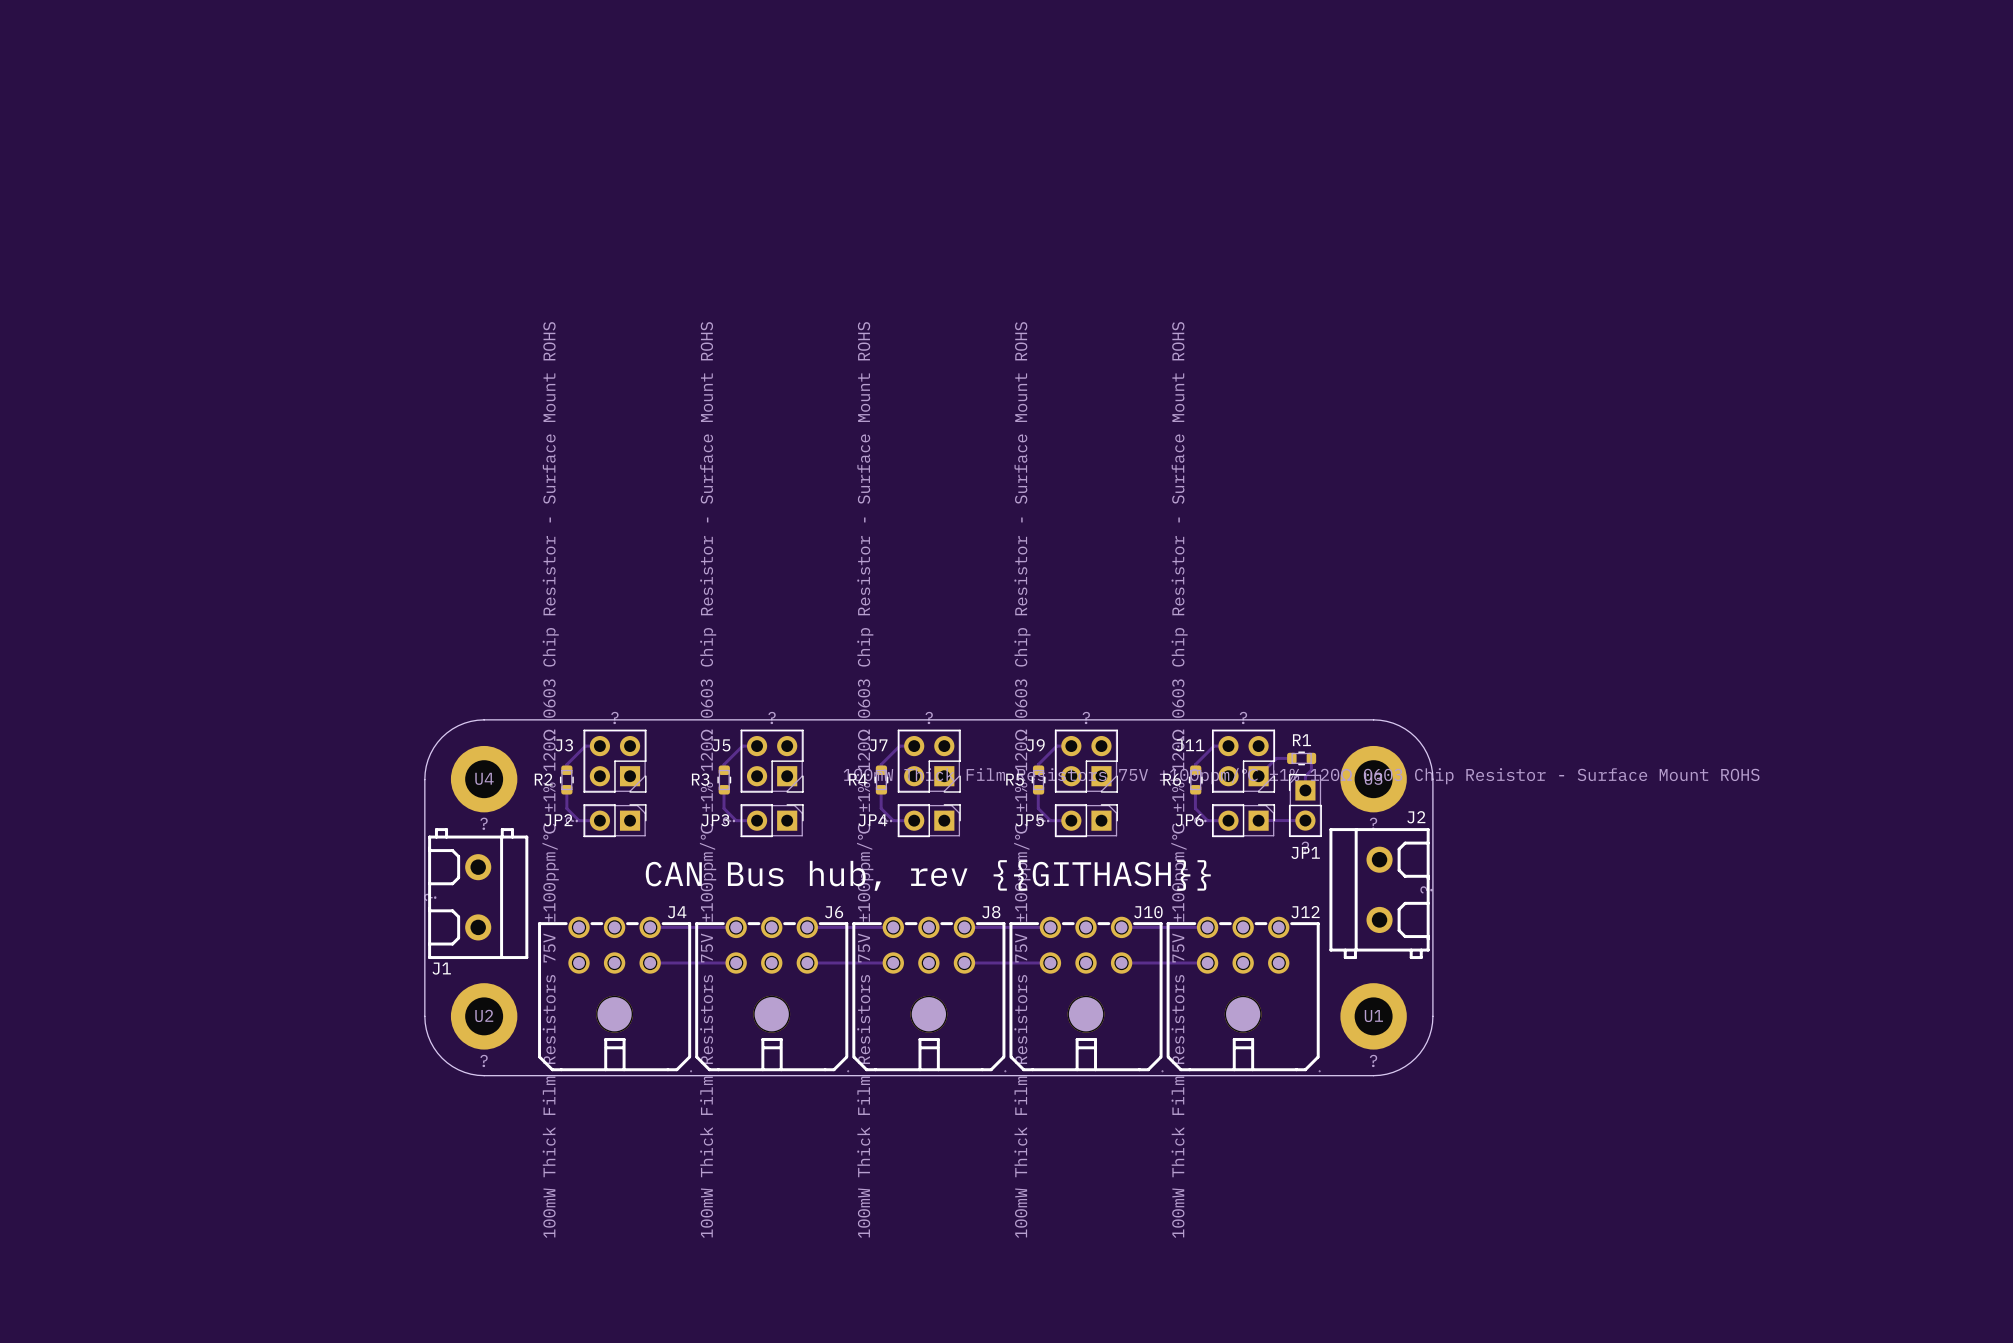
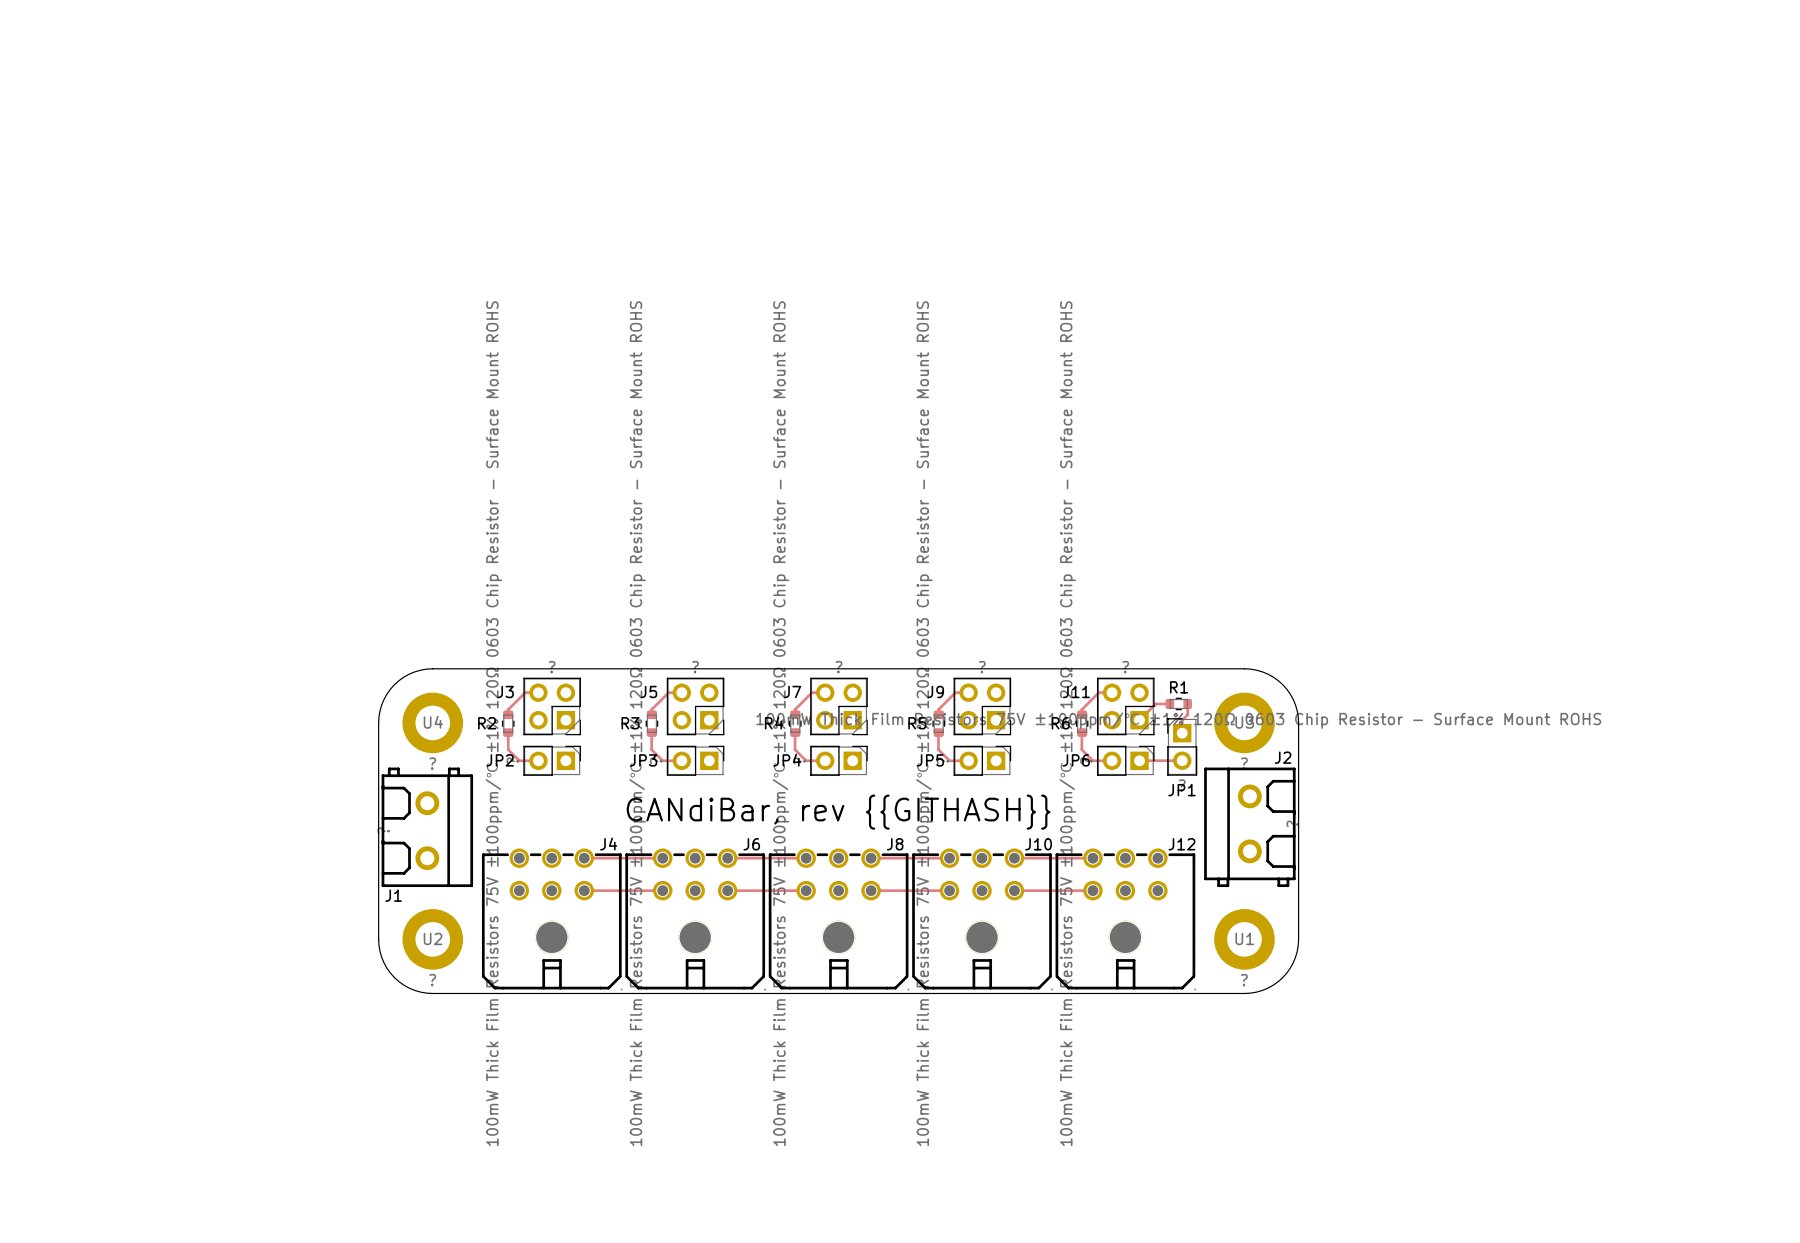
text: CAN Bus hub, rev {{GITHASH}} (928, 875) -> CANdiBar, rev {{GITHASH}} (838, 812)

